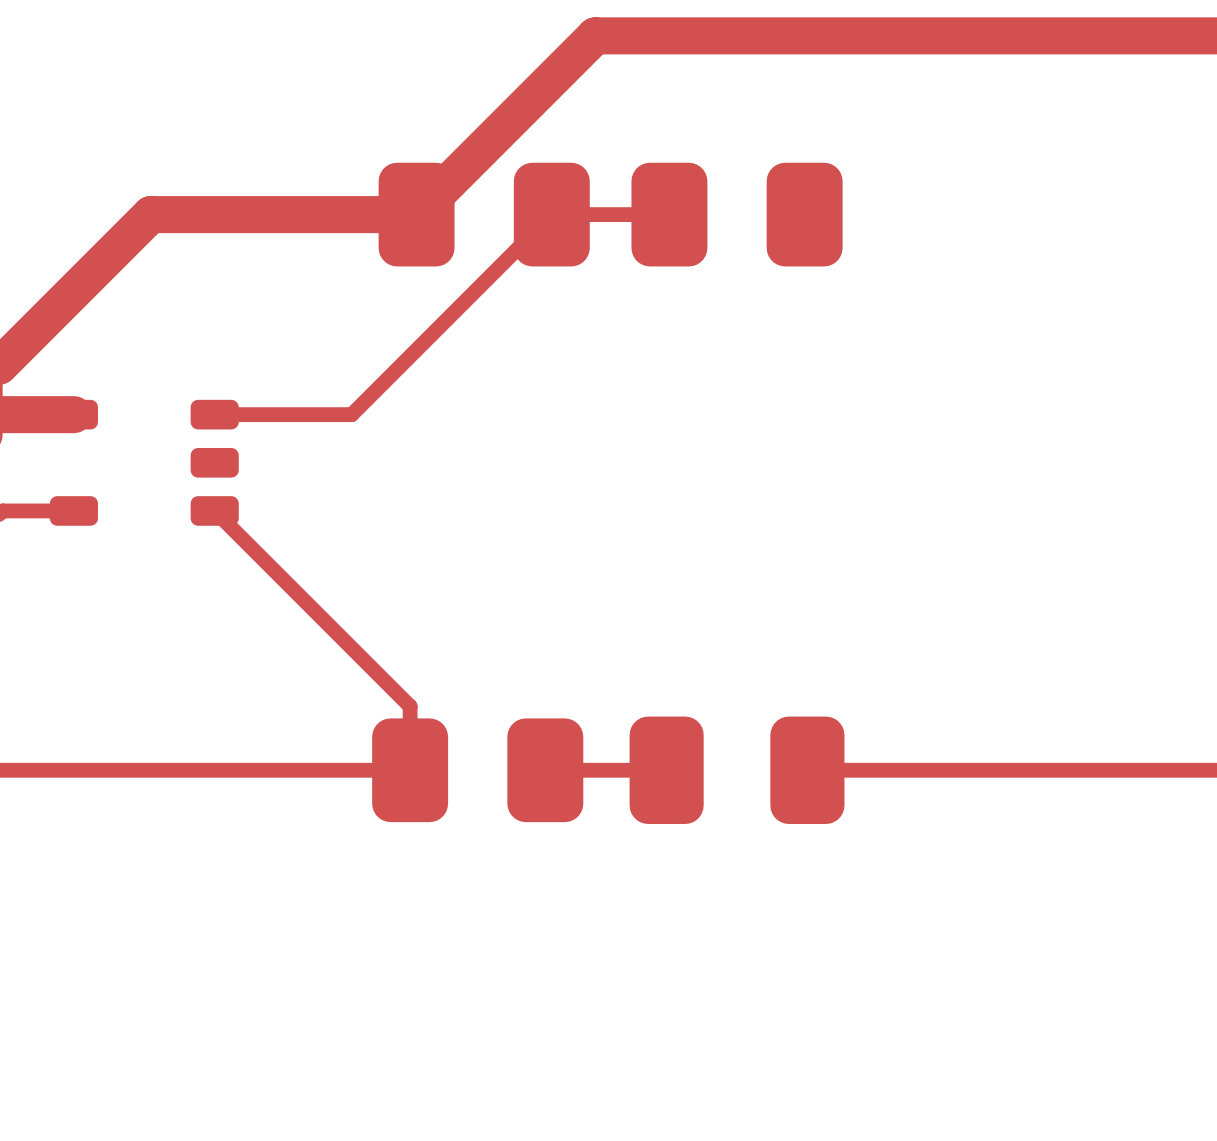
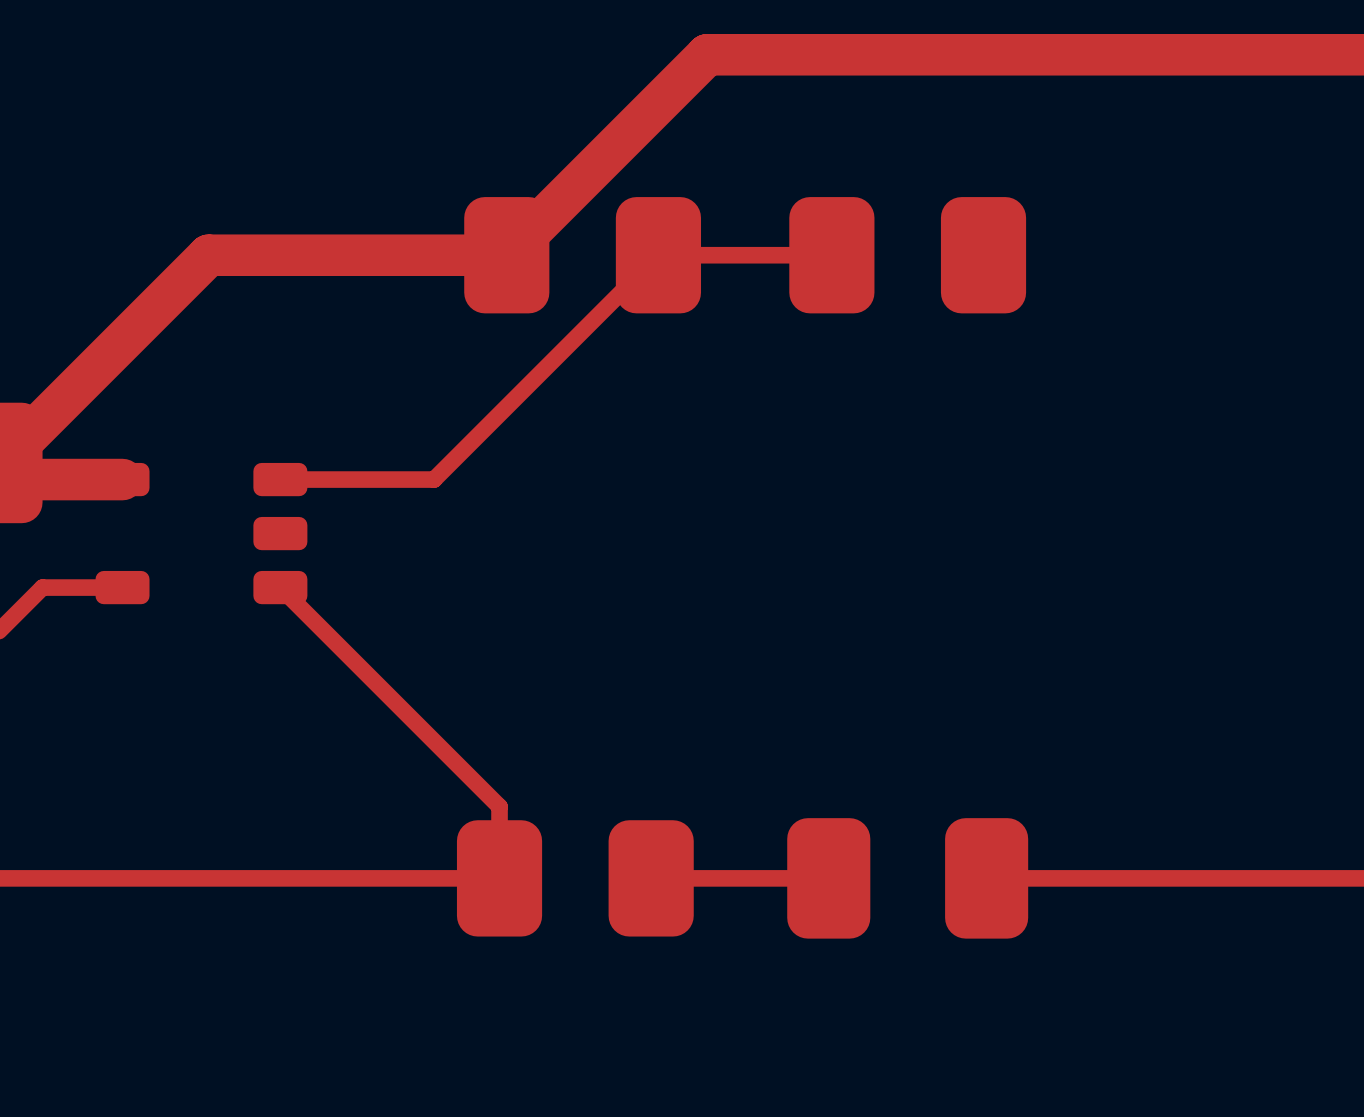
part position: (737, 214) -> (907, 255)
part position: (737, 770) -> (907, 878)

